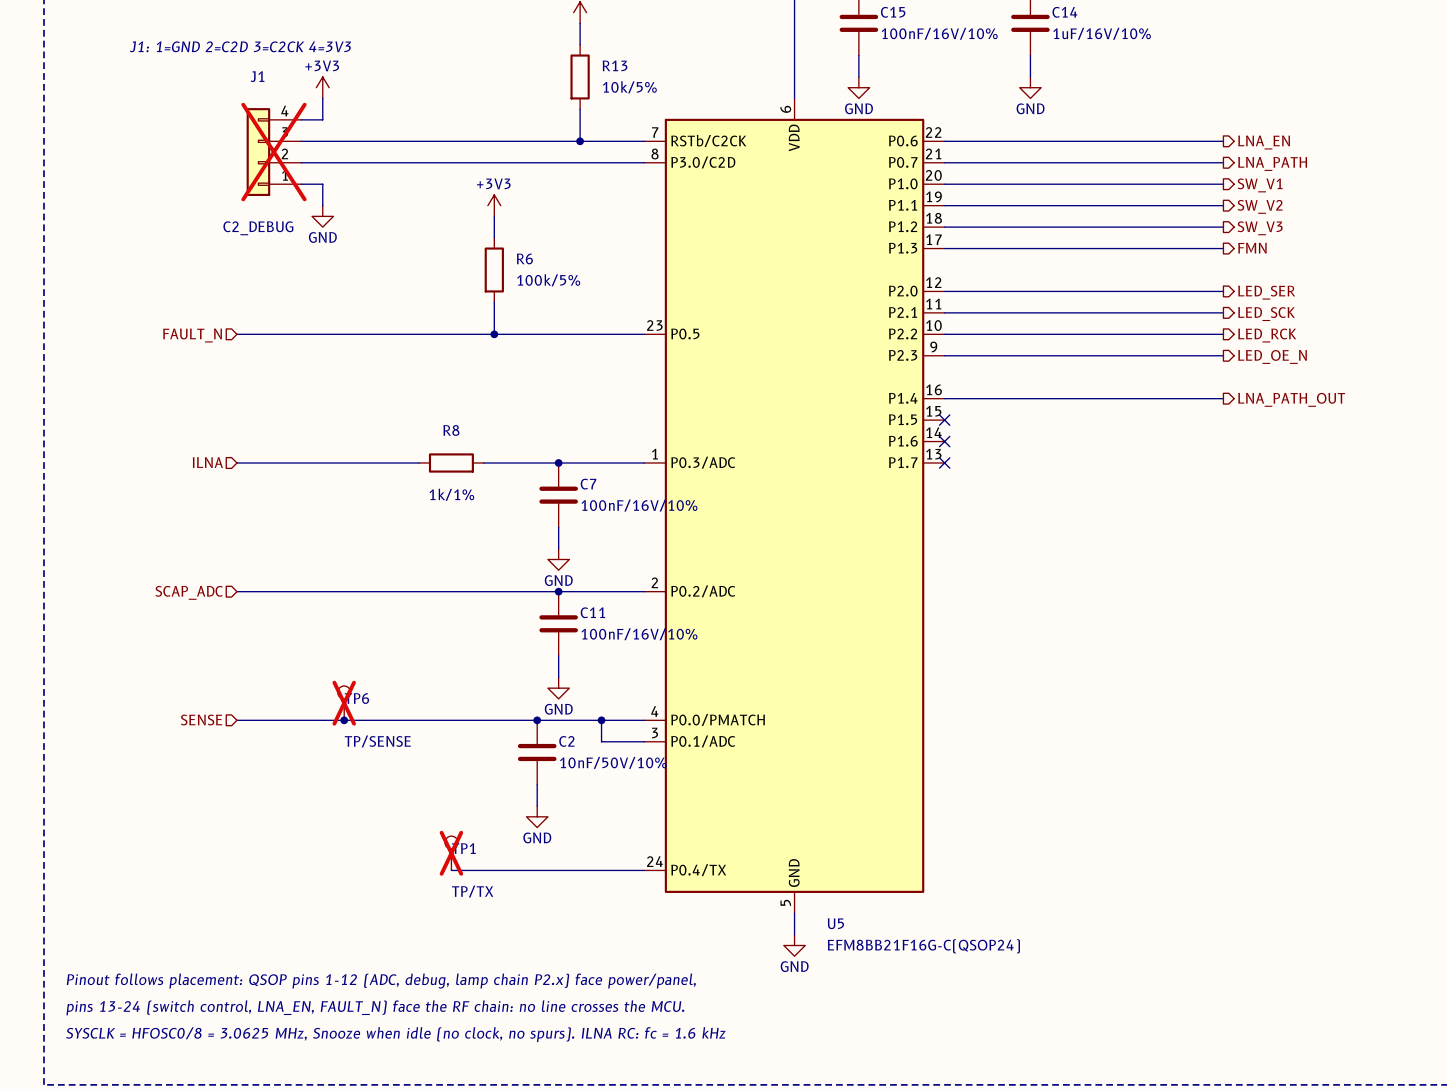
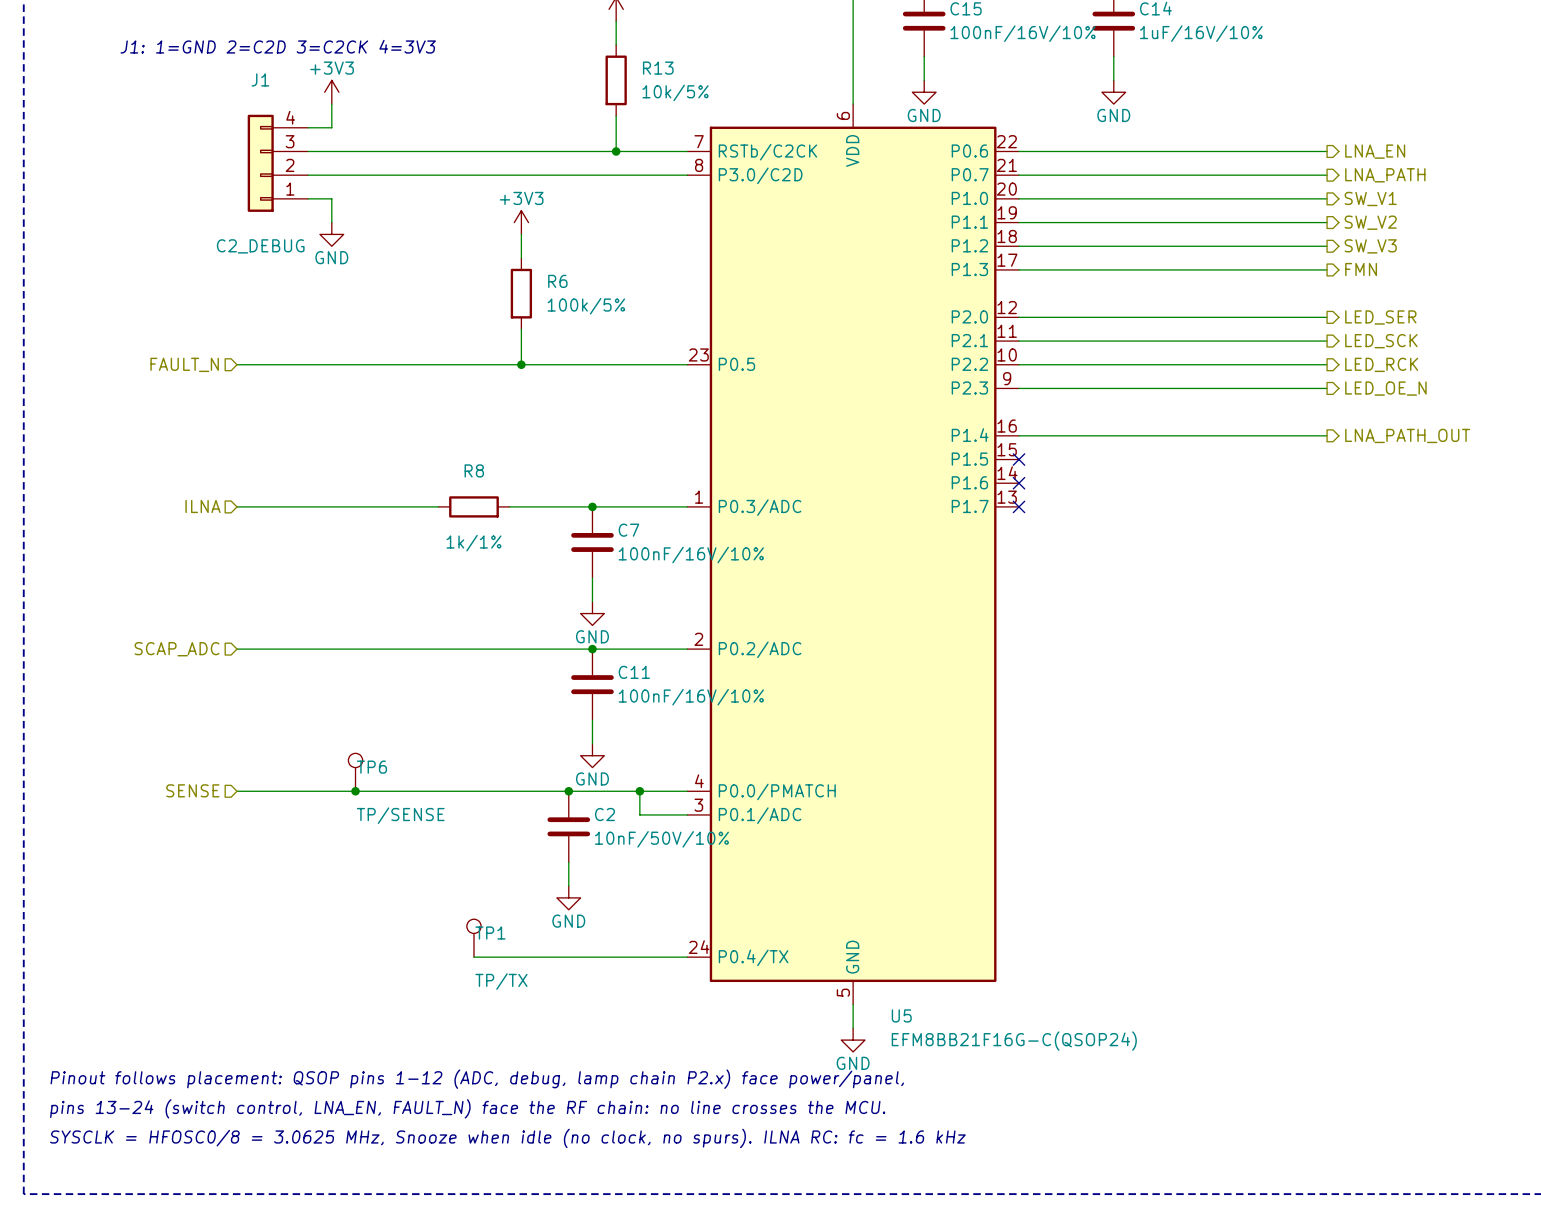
J1 do-not-place cross: (273, 152) -> none
TP6 do-not-place cross: (344, 703) -> none
TP1 do-not-place cross: (451, 853) -> none

